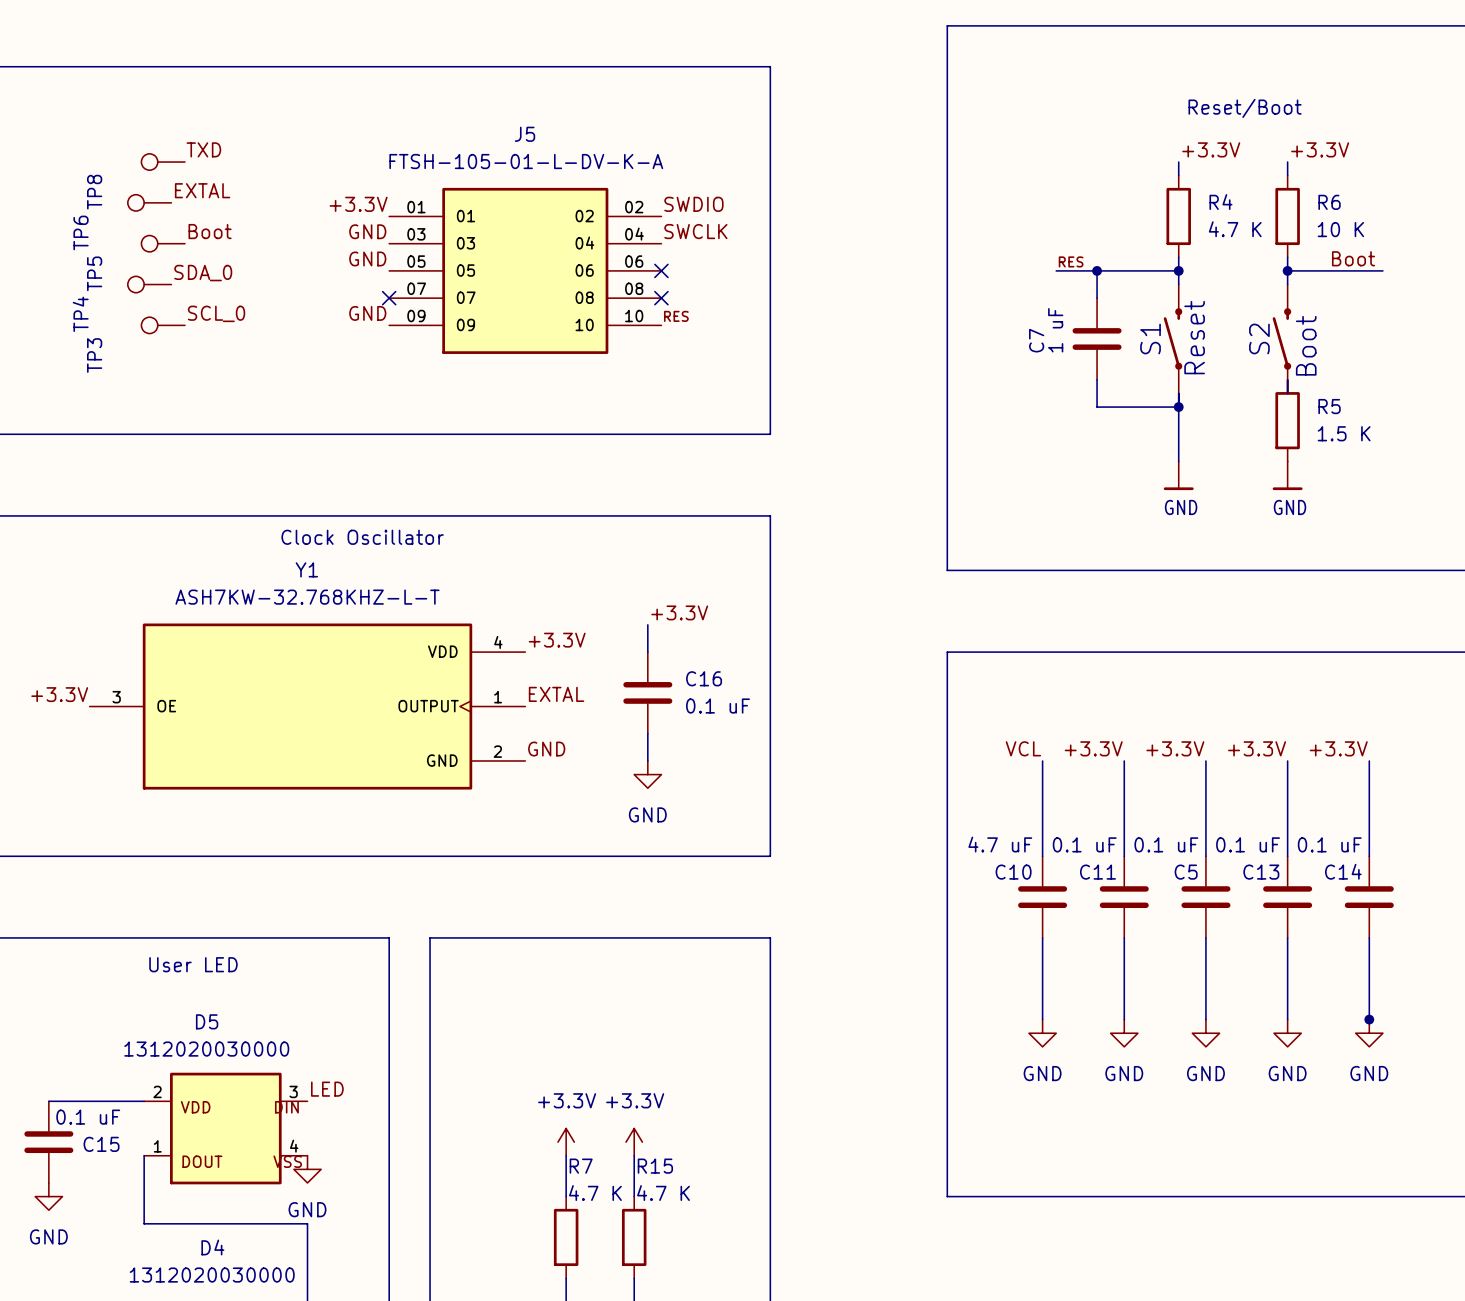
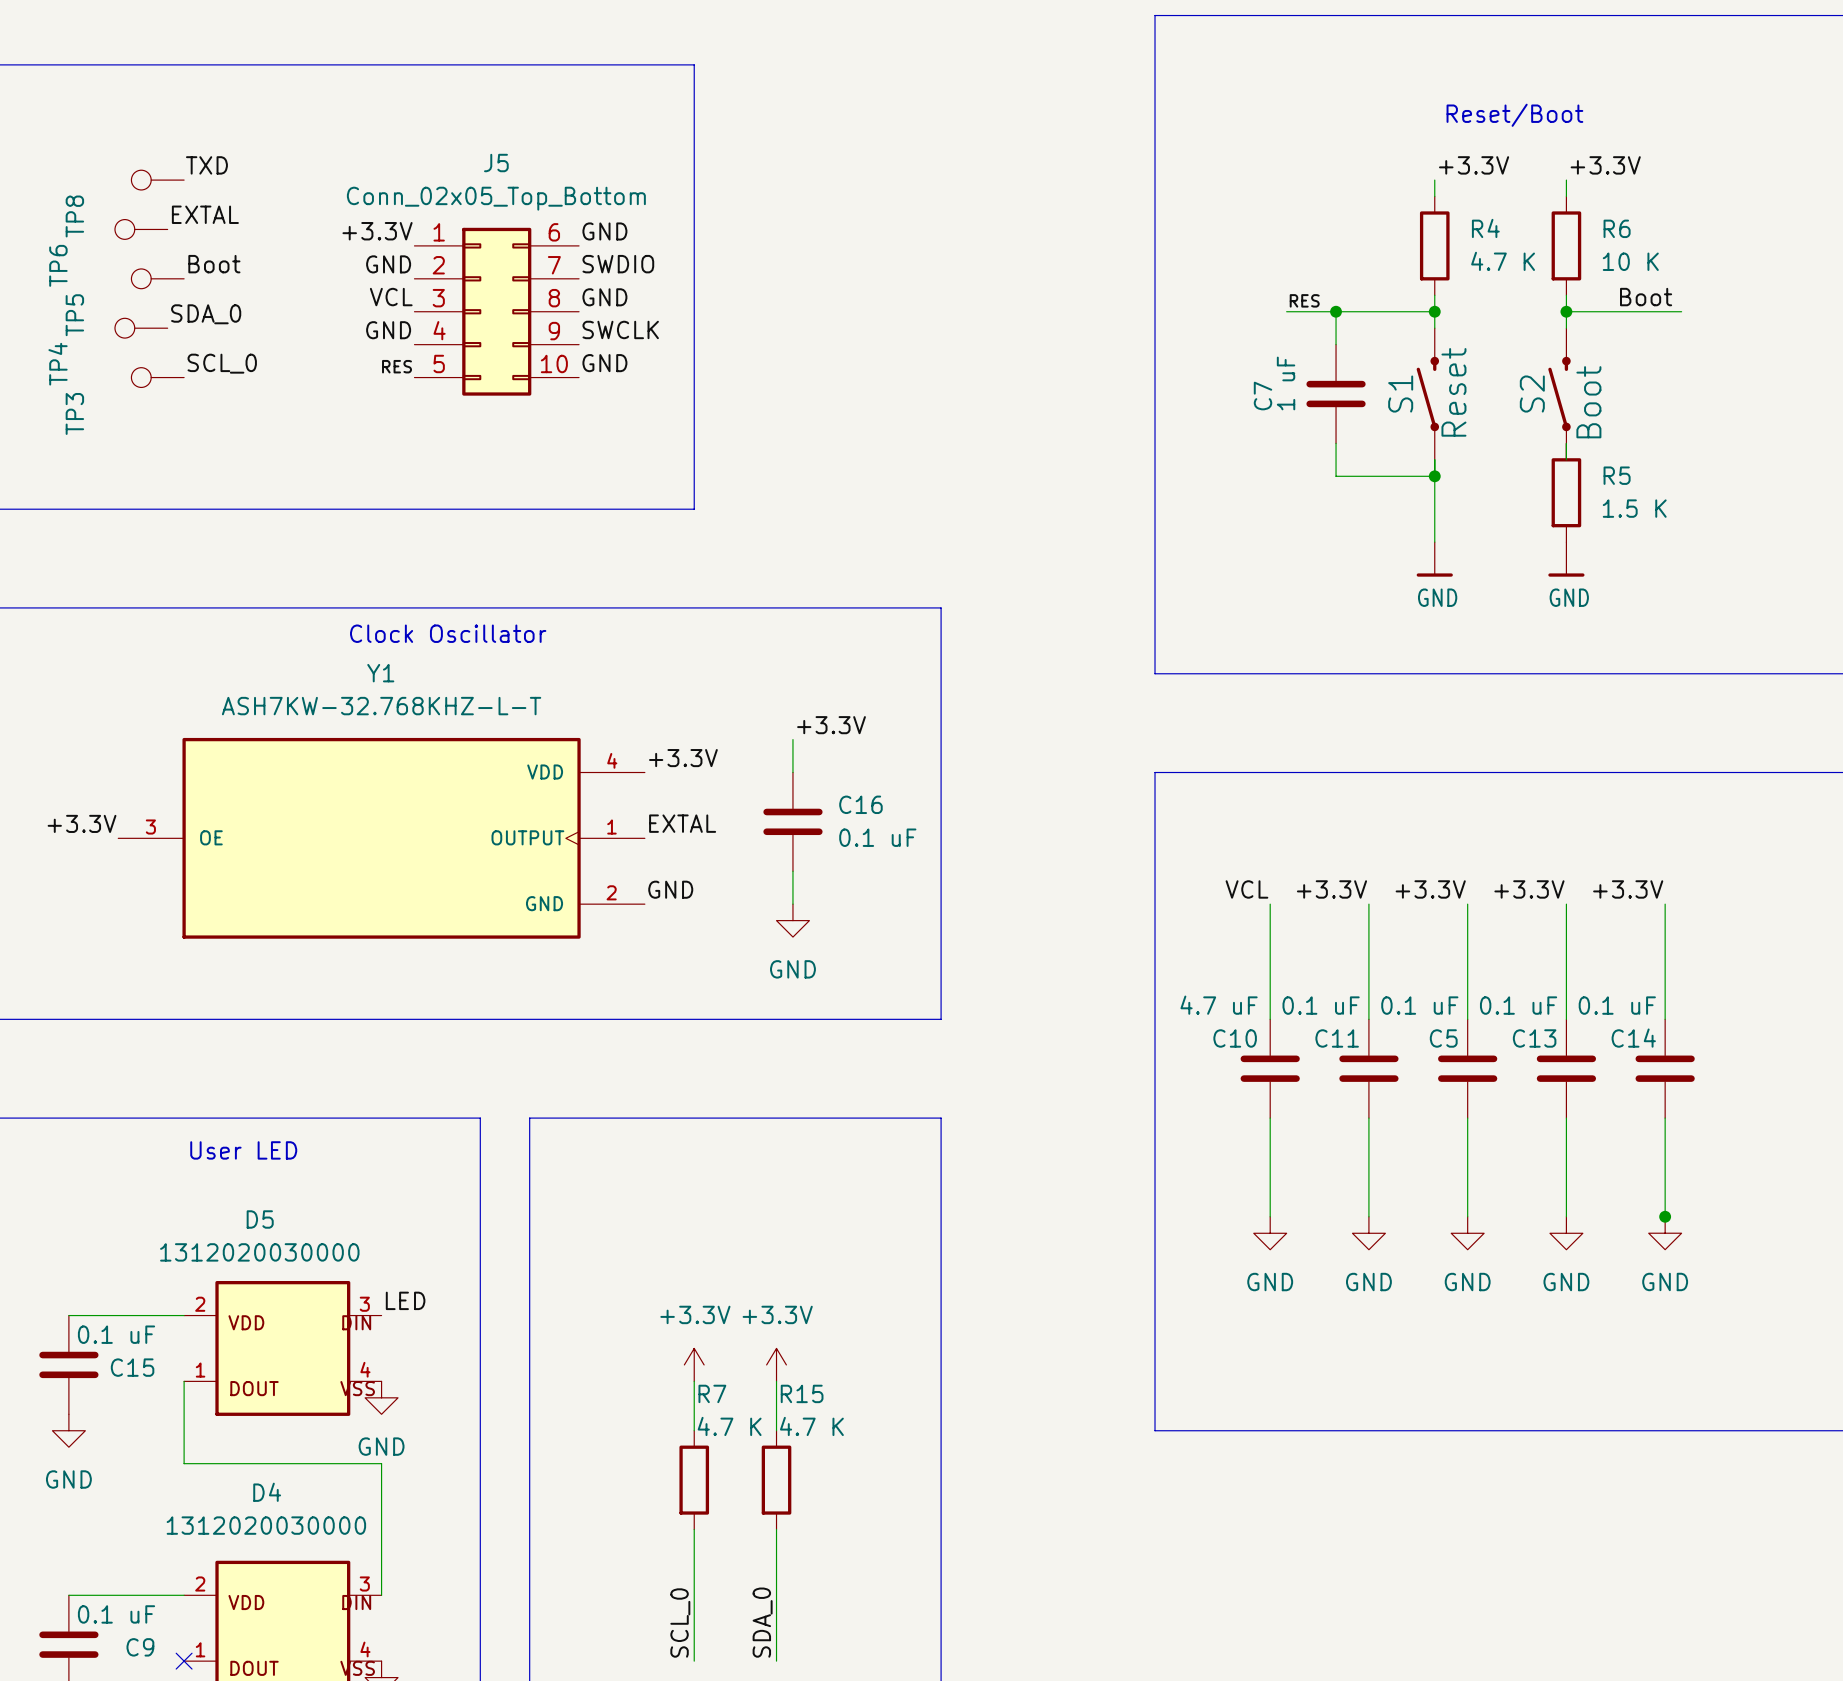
line: (566, 66) (770, 66) (770, 434) (566, 434) -> (694, 64) (694, 509)
label position: TXD (203, 149) -> TXD (206, 165)
J5 value: FTSH-105-01-L-DV-K-A (526, 161) -> Conn_02x05_Top_Bottom (496, 198)
TP8 position: (163, 162) -> (157, 180)
J5 symbol: [389, 187, 662, 354] -> [414, 227, 580, 396]
label position: EXTAL (202, 190) -> EXTAL (205, 214)
TP6 position: (149, 202) -> (141, 229)
label position: +3.3V (358, 204) -> +3.3V (377, 231)
label: none -> GND (604, 231)
label position: SWDIO (693, 204) -> SWDIO (618, 264)
label position: Boot (210, 231) -> Boot (214, 264)
label: none -> GND (388, 264)
label: GND (367, 231) -> none
label position: SWCLK (695, 231) -> SWCLK (620, 329)
TP5 position: (163, 243) -> (157, 278)
label: none -> VCL (391, 297)
label: GND (367, 258) -> none
label: none -> GND (604, 297)
no-connect mark: (661, 270) -> none
label position: SDA_0 (203, 273) -> SDA_0 (206, 314)
TP4 position: (149, 284) -> (141, 328)
label: none -> GND (388, 330)
no-connect mark: (389, 298) -> none
no-connect mark: (661, 298) -> none
label position: SCL_0 (216, 313) -> SCL_0 (222, 363)
label: GND (367, 313) -> none
label: none -> GND (604, 363)
label: none -> RES (397, 366)
label: RES (676, 316) -> none
TP3 position: (163, 325) -> (157, 377)

